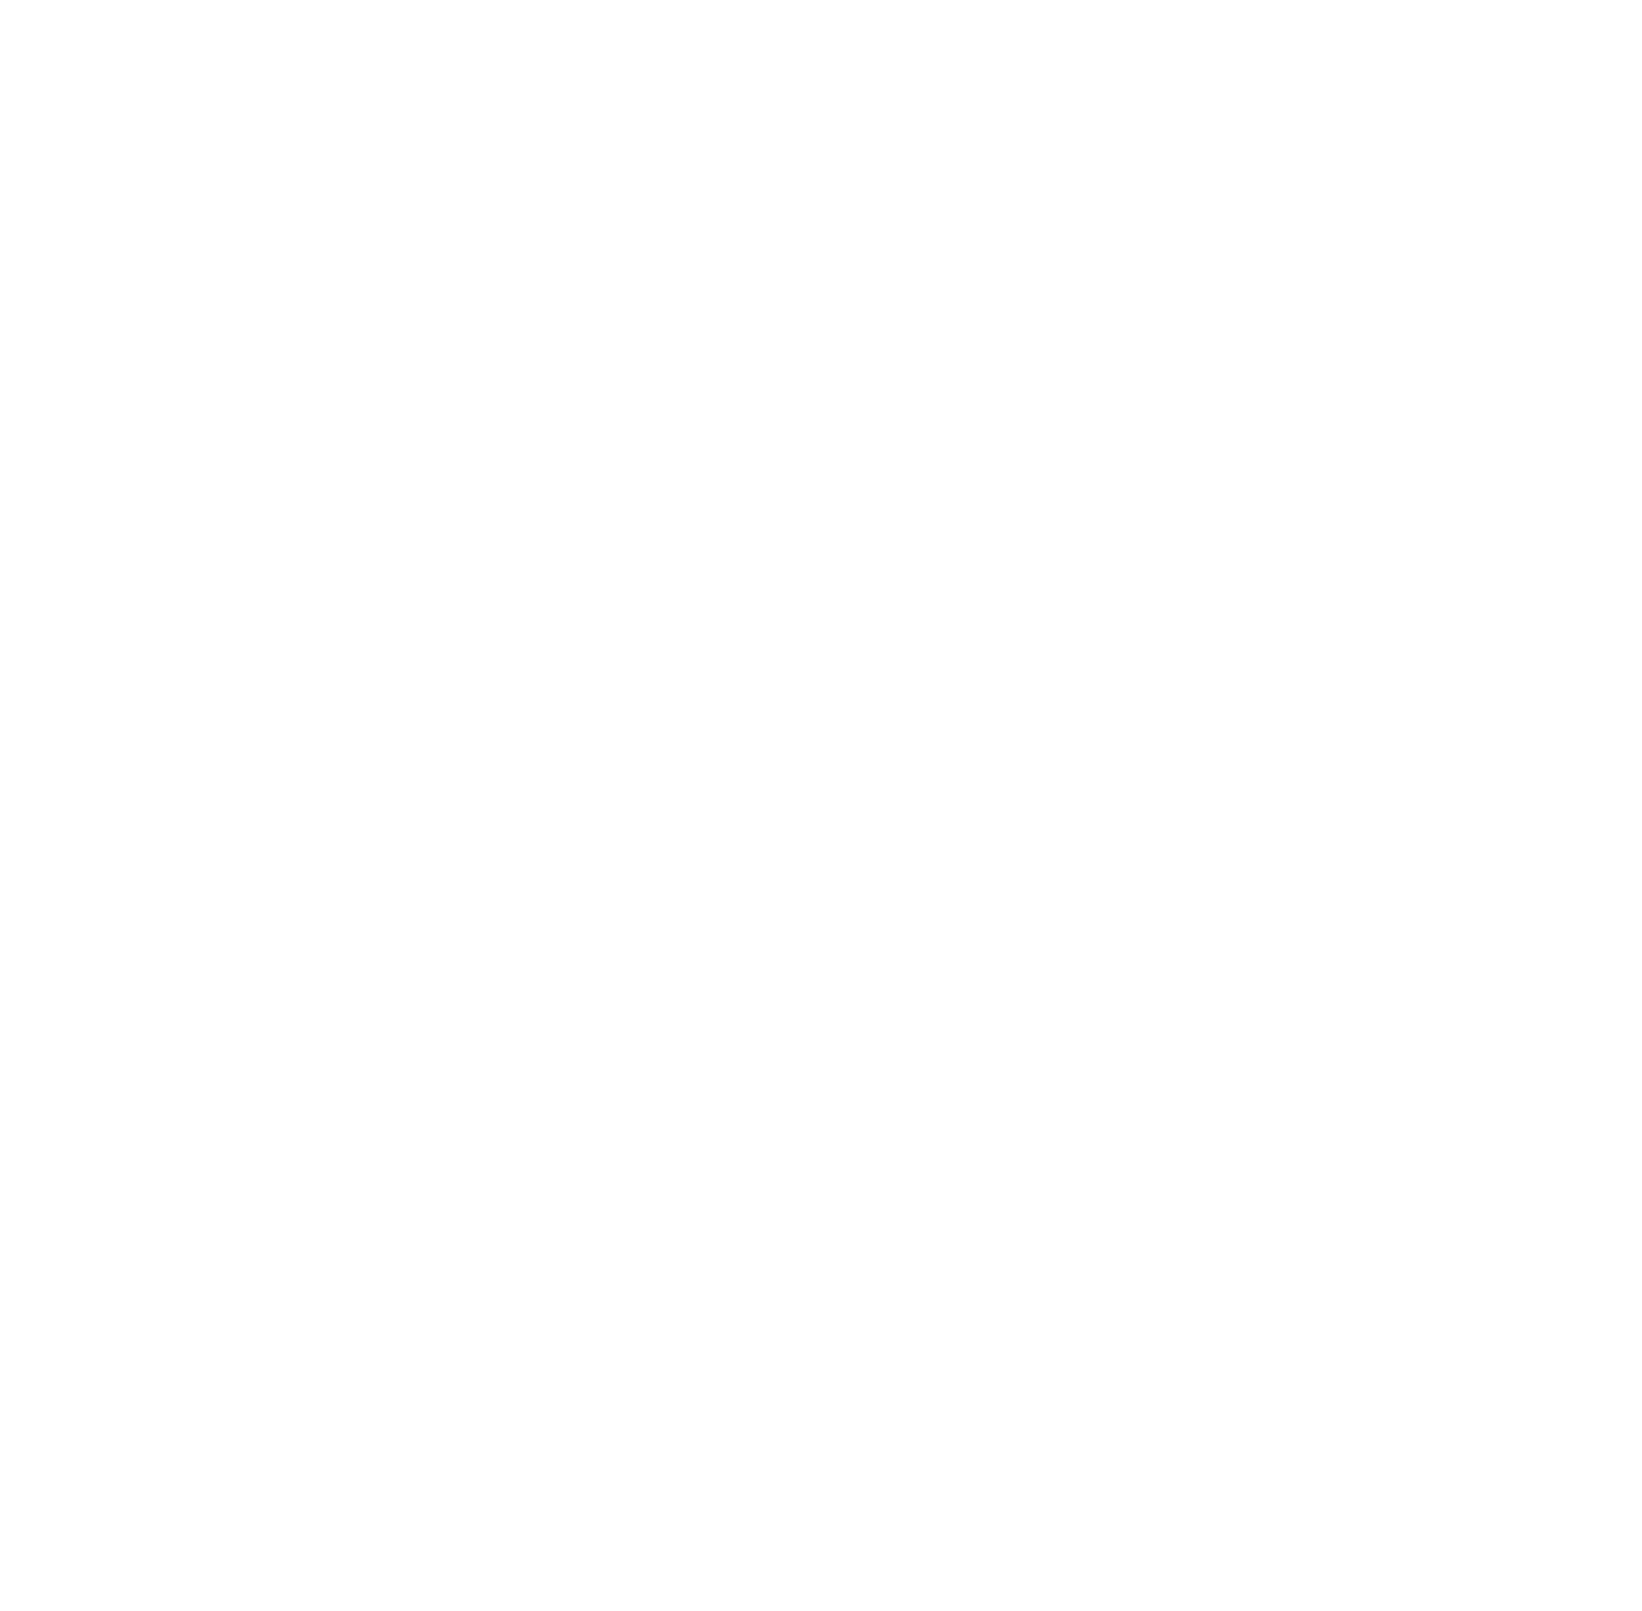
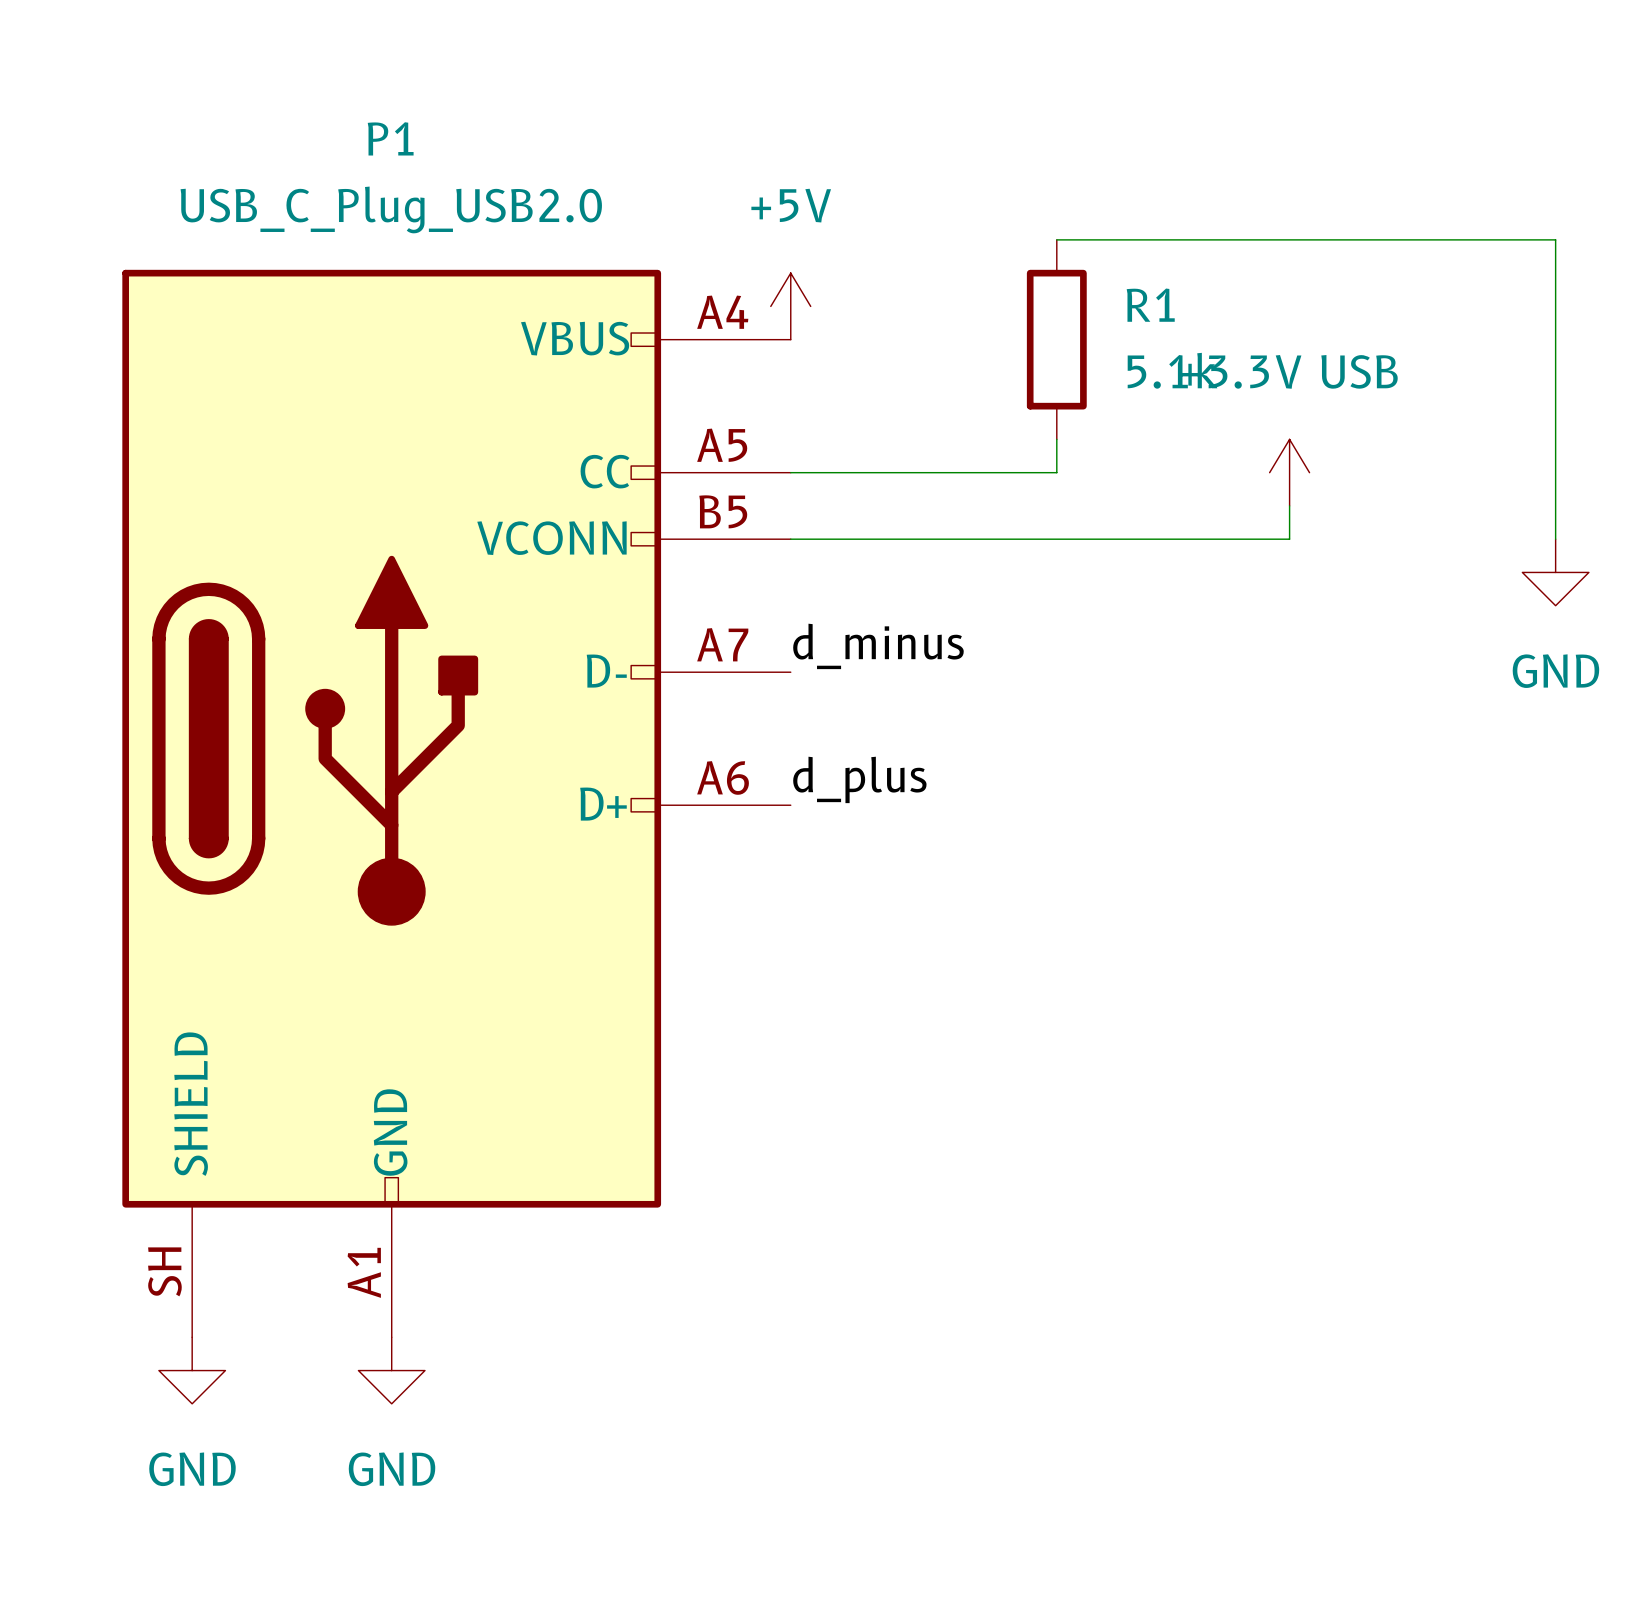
wire: none -> (1056, 239) (1555, 239) (1555, 539)
power symbol: none -> +5V (790, 306)
R1: none -> 5.1k (1056, 339)
wire: none -> (1056, 439) (1056, 472) (790, 472)
power symbol: none -> +3.3V USB (1289, 472)
wire: none -> (1289, 505) (1289, 539) (790, 539)
power symbol: none -> GND (1555, 572)
label: none -> d_minus (878, 646)
label: none -> d_plus (859, 779)
P1: none -> USB_C_Plug_USB2.0 (456, 803)
power symbol: none -> GND (192, 1370)
power symbol: none -> GND (391, 1370)

